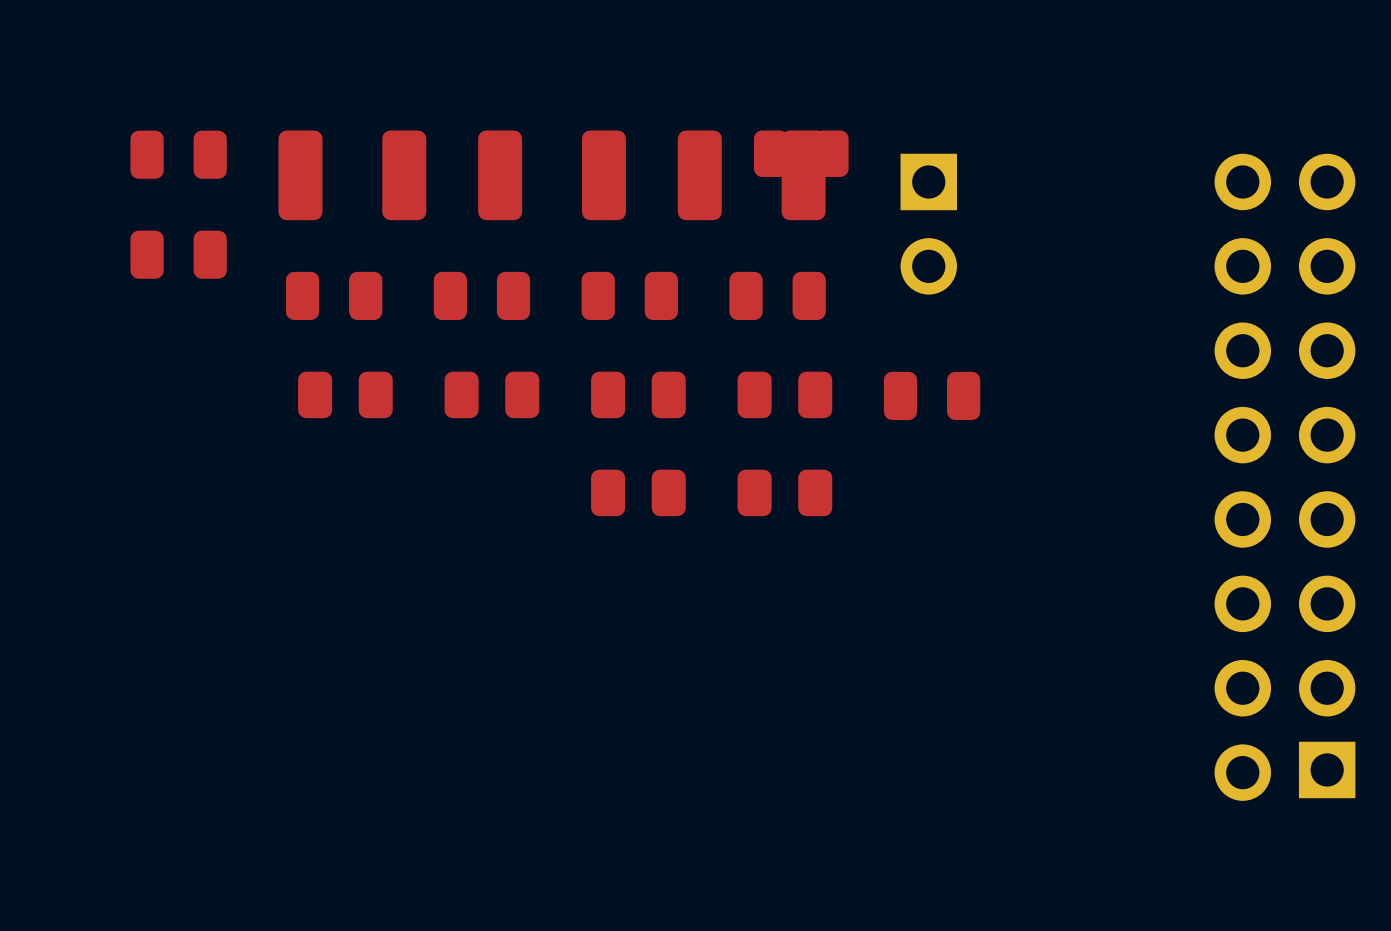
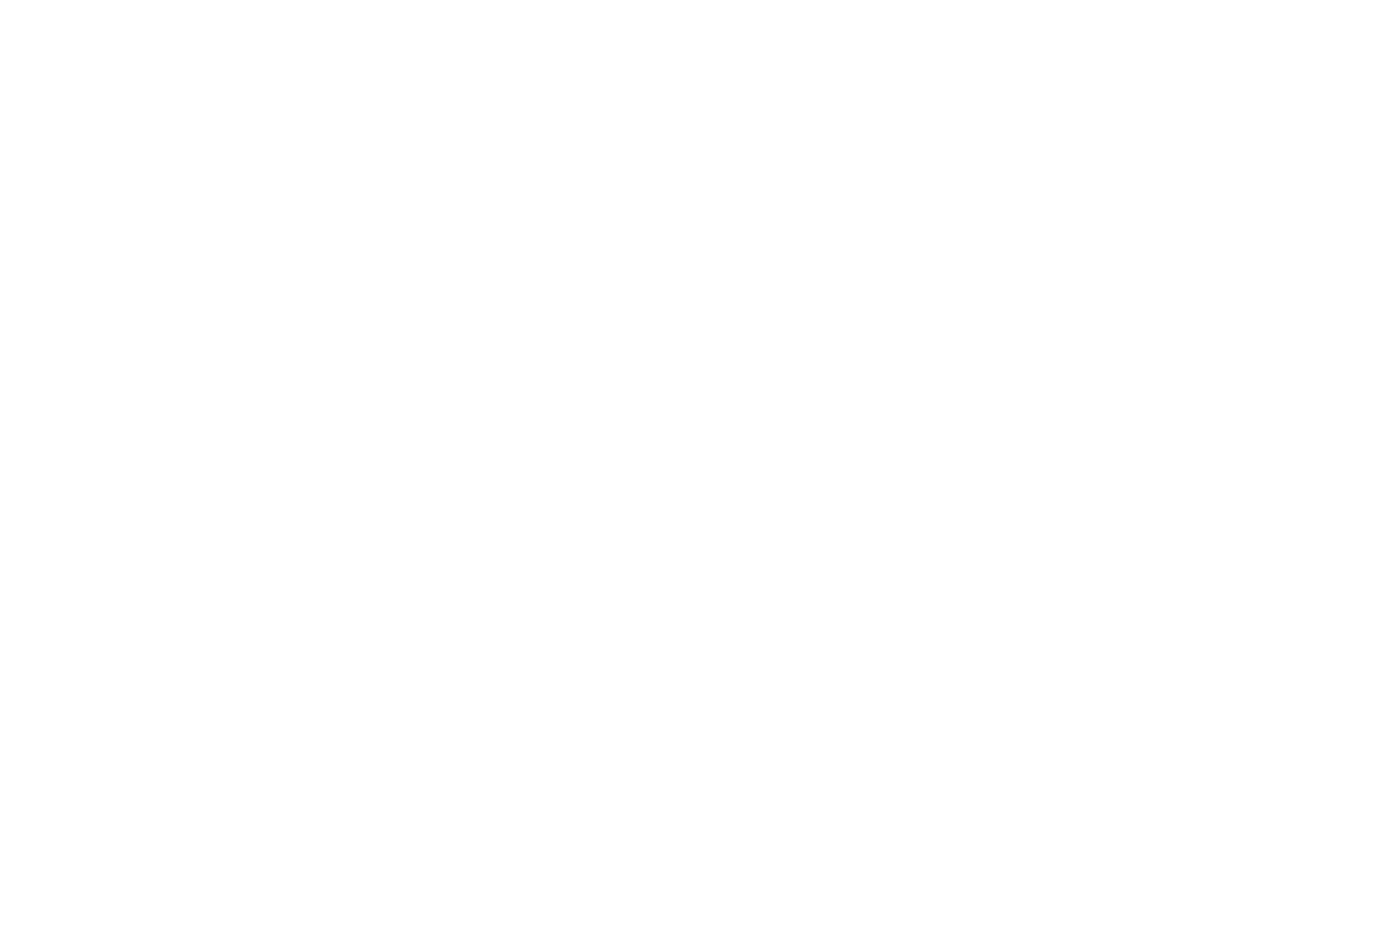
part: (801, 153) -> none
part: (178, 154) -> none
part: (352, 175) -> none
part: (552, 175) -> none
part: (751, 175) -> none
part: (928, 224) -> none
part: (178, 254) -> none
part: (334, 295) -> none
part: (481, 295) -> none
part: (629, 295) -> none
part: (777, 295) -> none
part: (345, 394) -> none
part: (491, 394) -> none
part: (638, 394) -> none
part: (784, 394) -> none
part: (932, 395) -> none
part: (1284, 477) -> none
part: (638, 492) -> none
part: (784, 492) -> none

